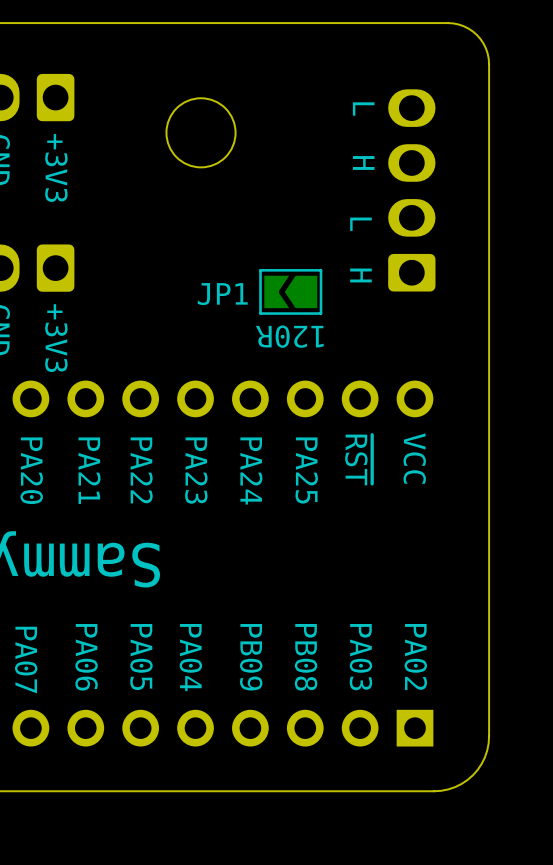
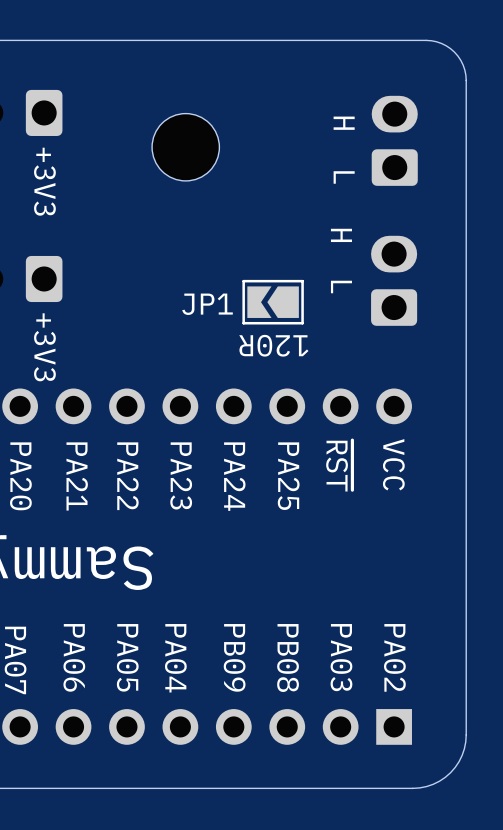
text: L (363, 108) -> H (344, 123)
part: none -> (394, 140)
text: H (363, 162) -> L (344, 177)
part: (411, 190) -> none
text: L (360, 224) -> H (341, 235)
part: none -> (394, 280)
text: H (360, 275) -> L (341, 286)

